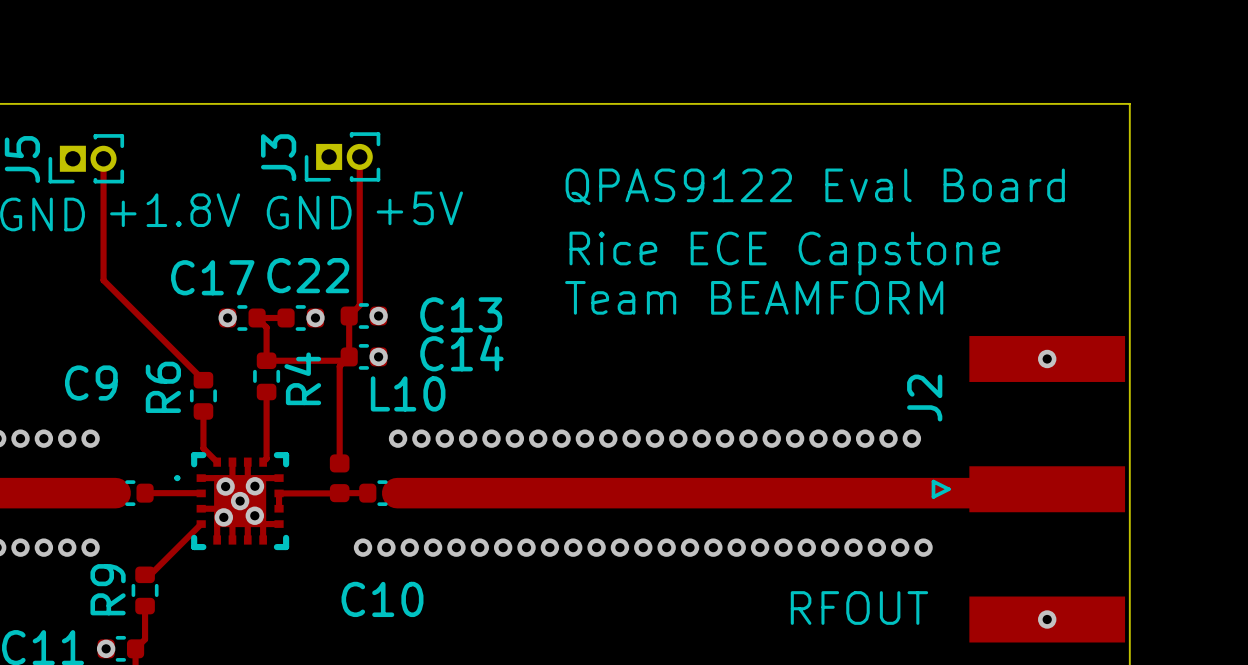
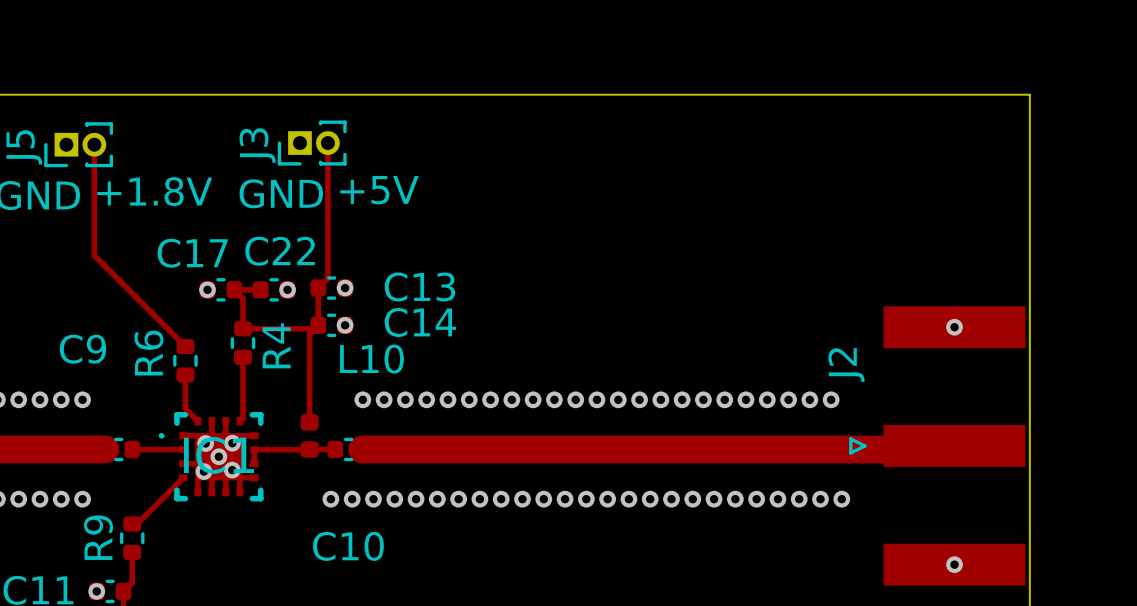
text: QPAS9122 Eval Board (815, 186) -> none
text: Rice ECE Capstone (784, 253) -> none
text: Team BEAMFORM (754, 297) -> none
IC1 name: none -> IC1 (219, 455)
text: RFOUT (859, 608) -> none

